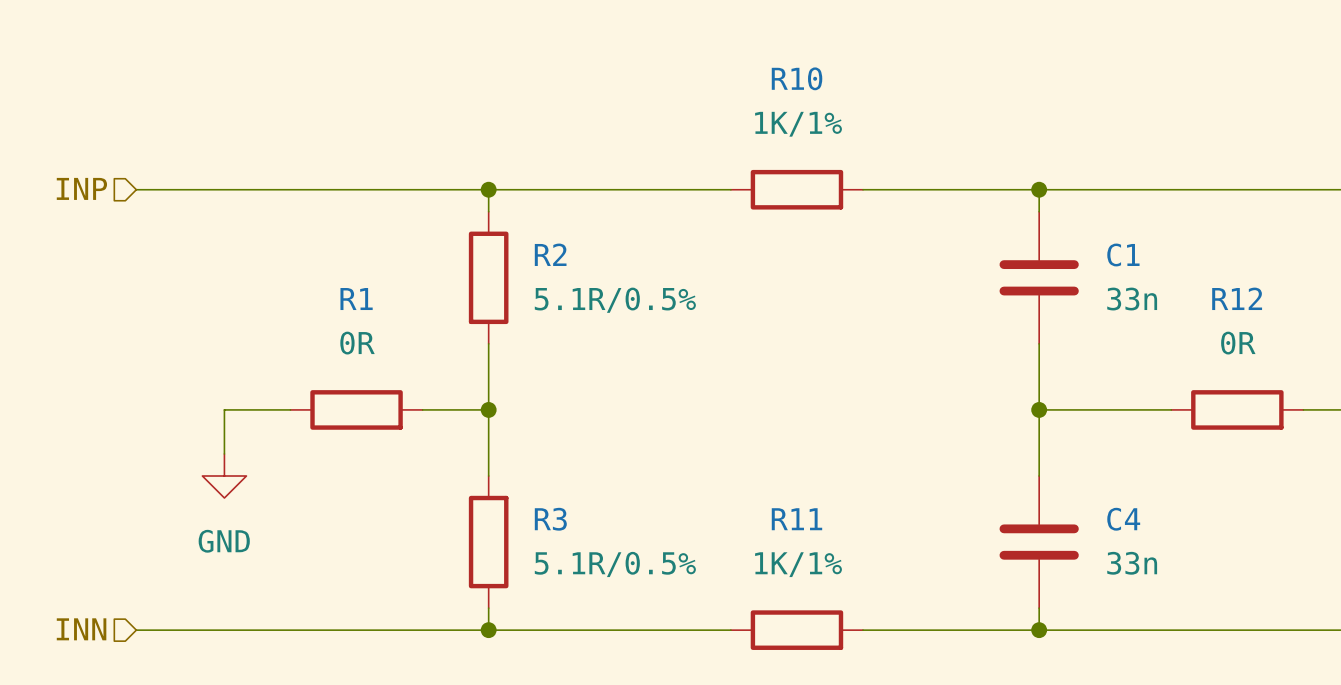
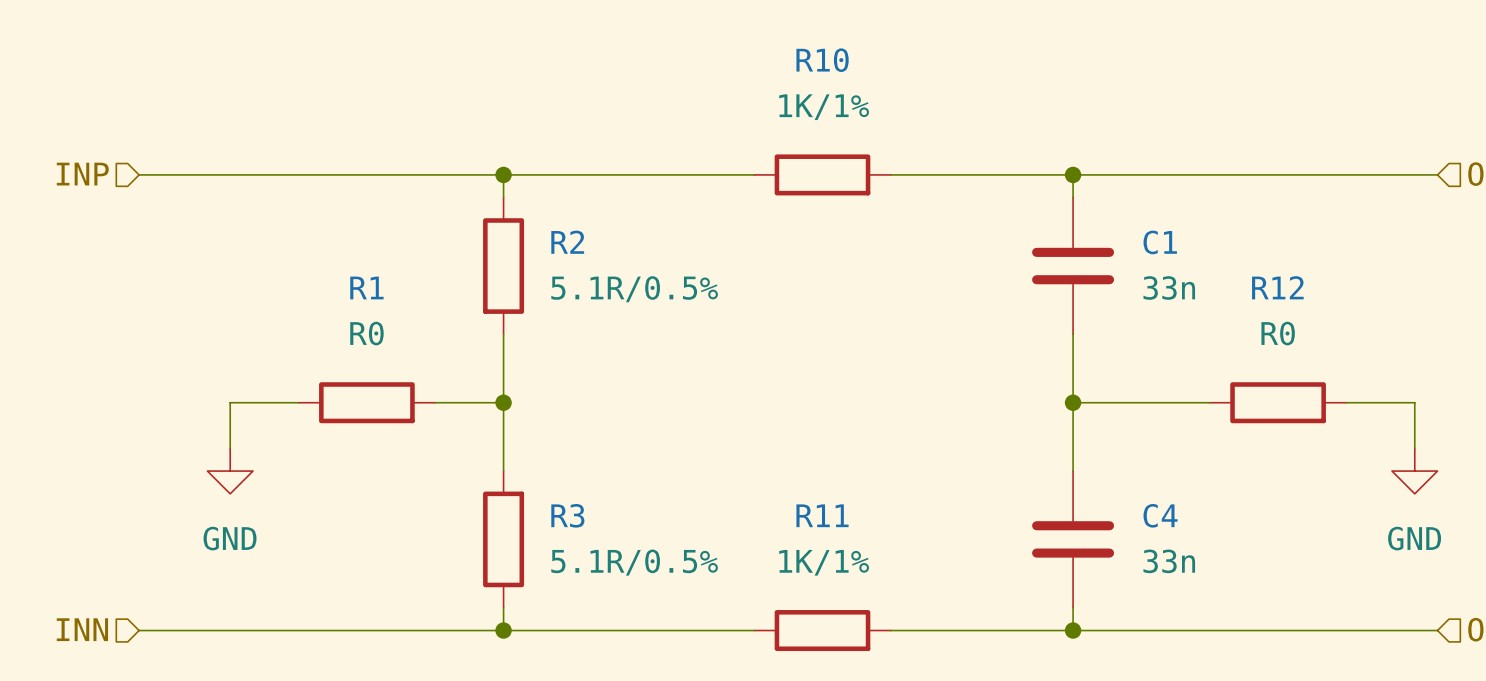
R1 value: 0R (357, 343) -> R0 (366, 333)
R12 value: 0R (1238, 343) -> R0 (1278, 333)

